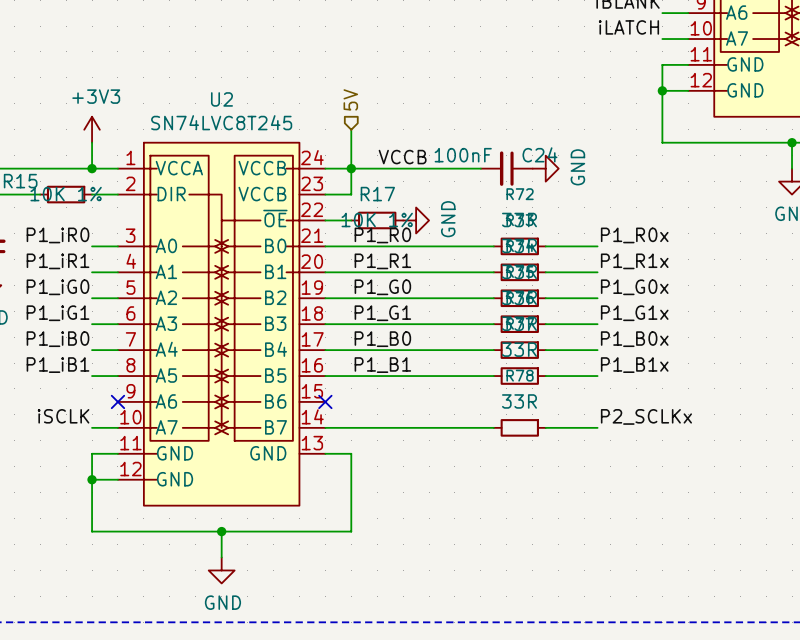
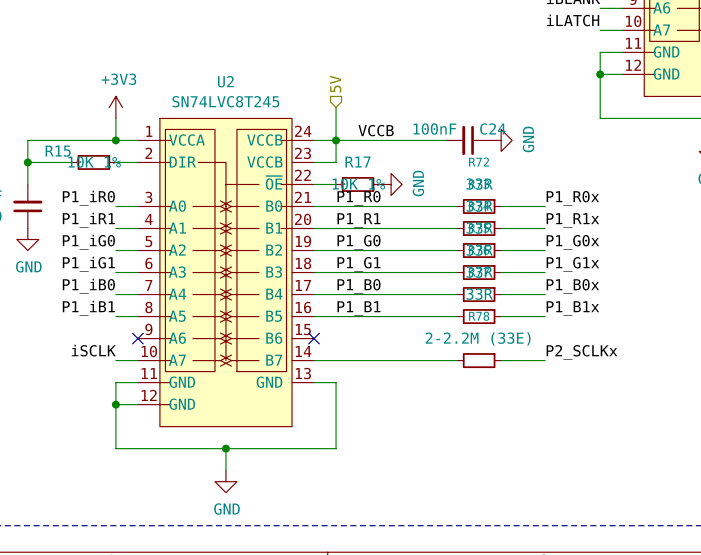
R78 value: 33R (519, 401) -> 2-2.2M (33E) (478, 338)

